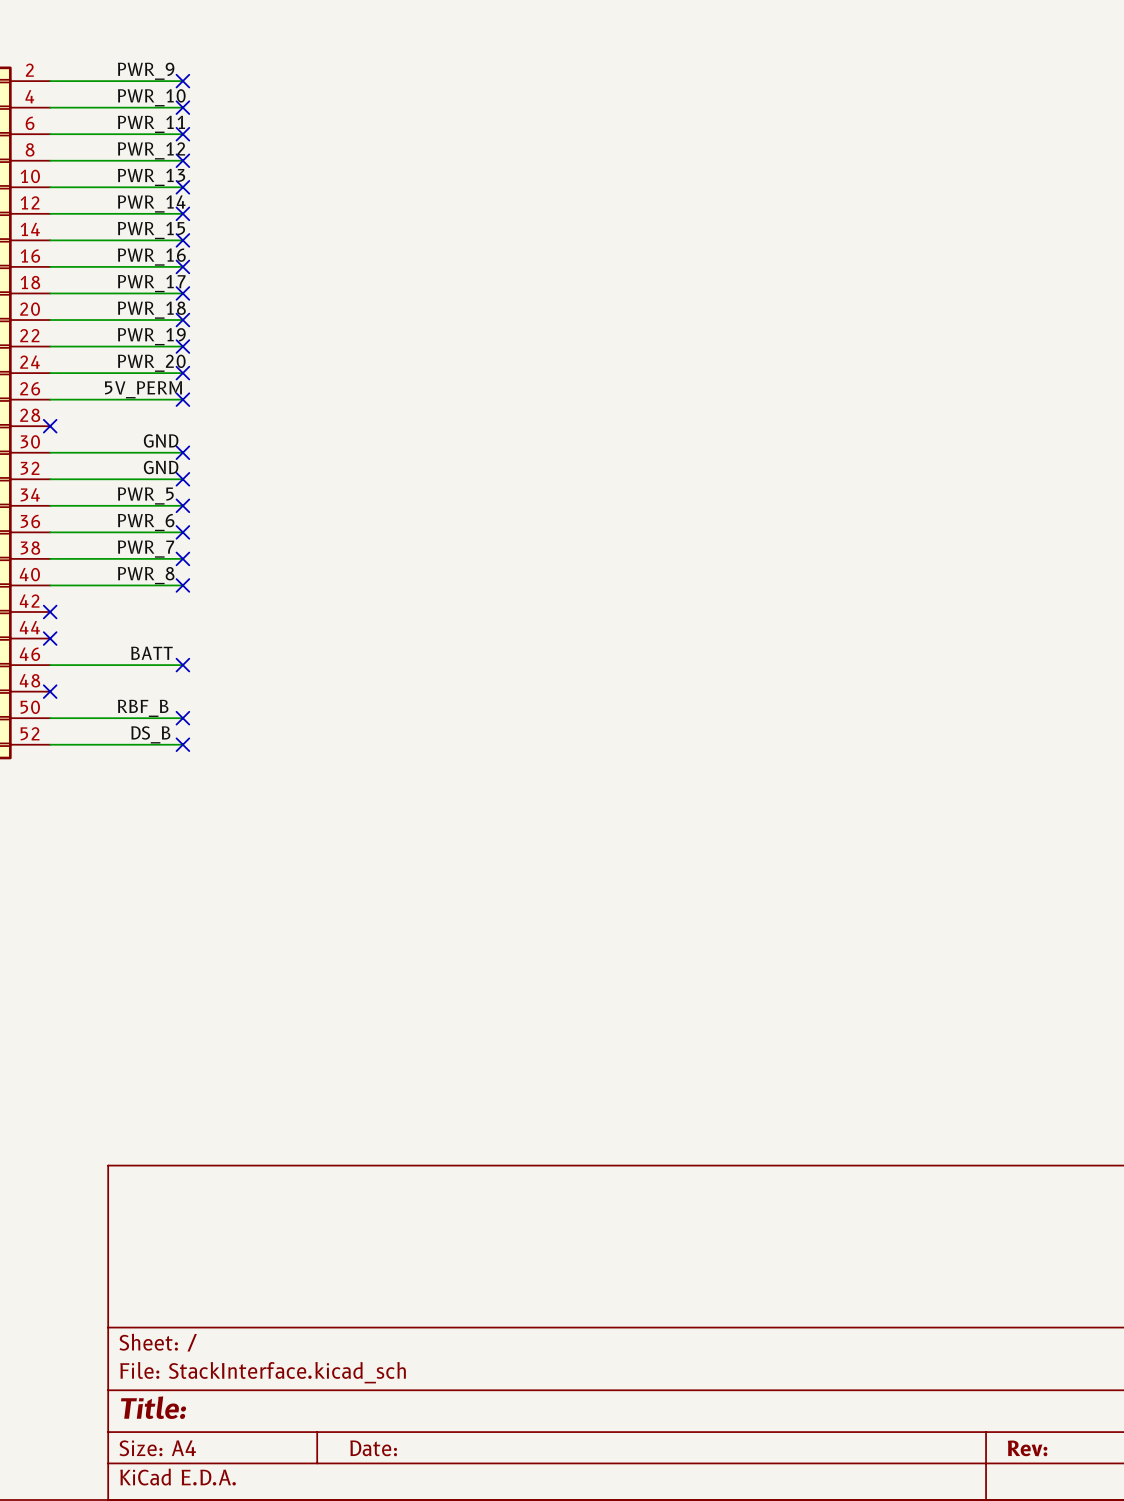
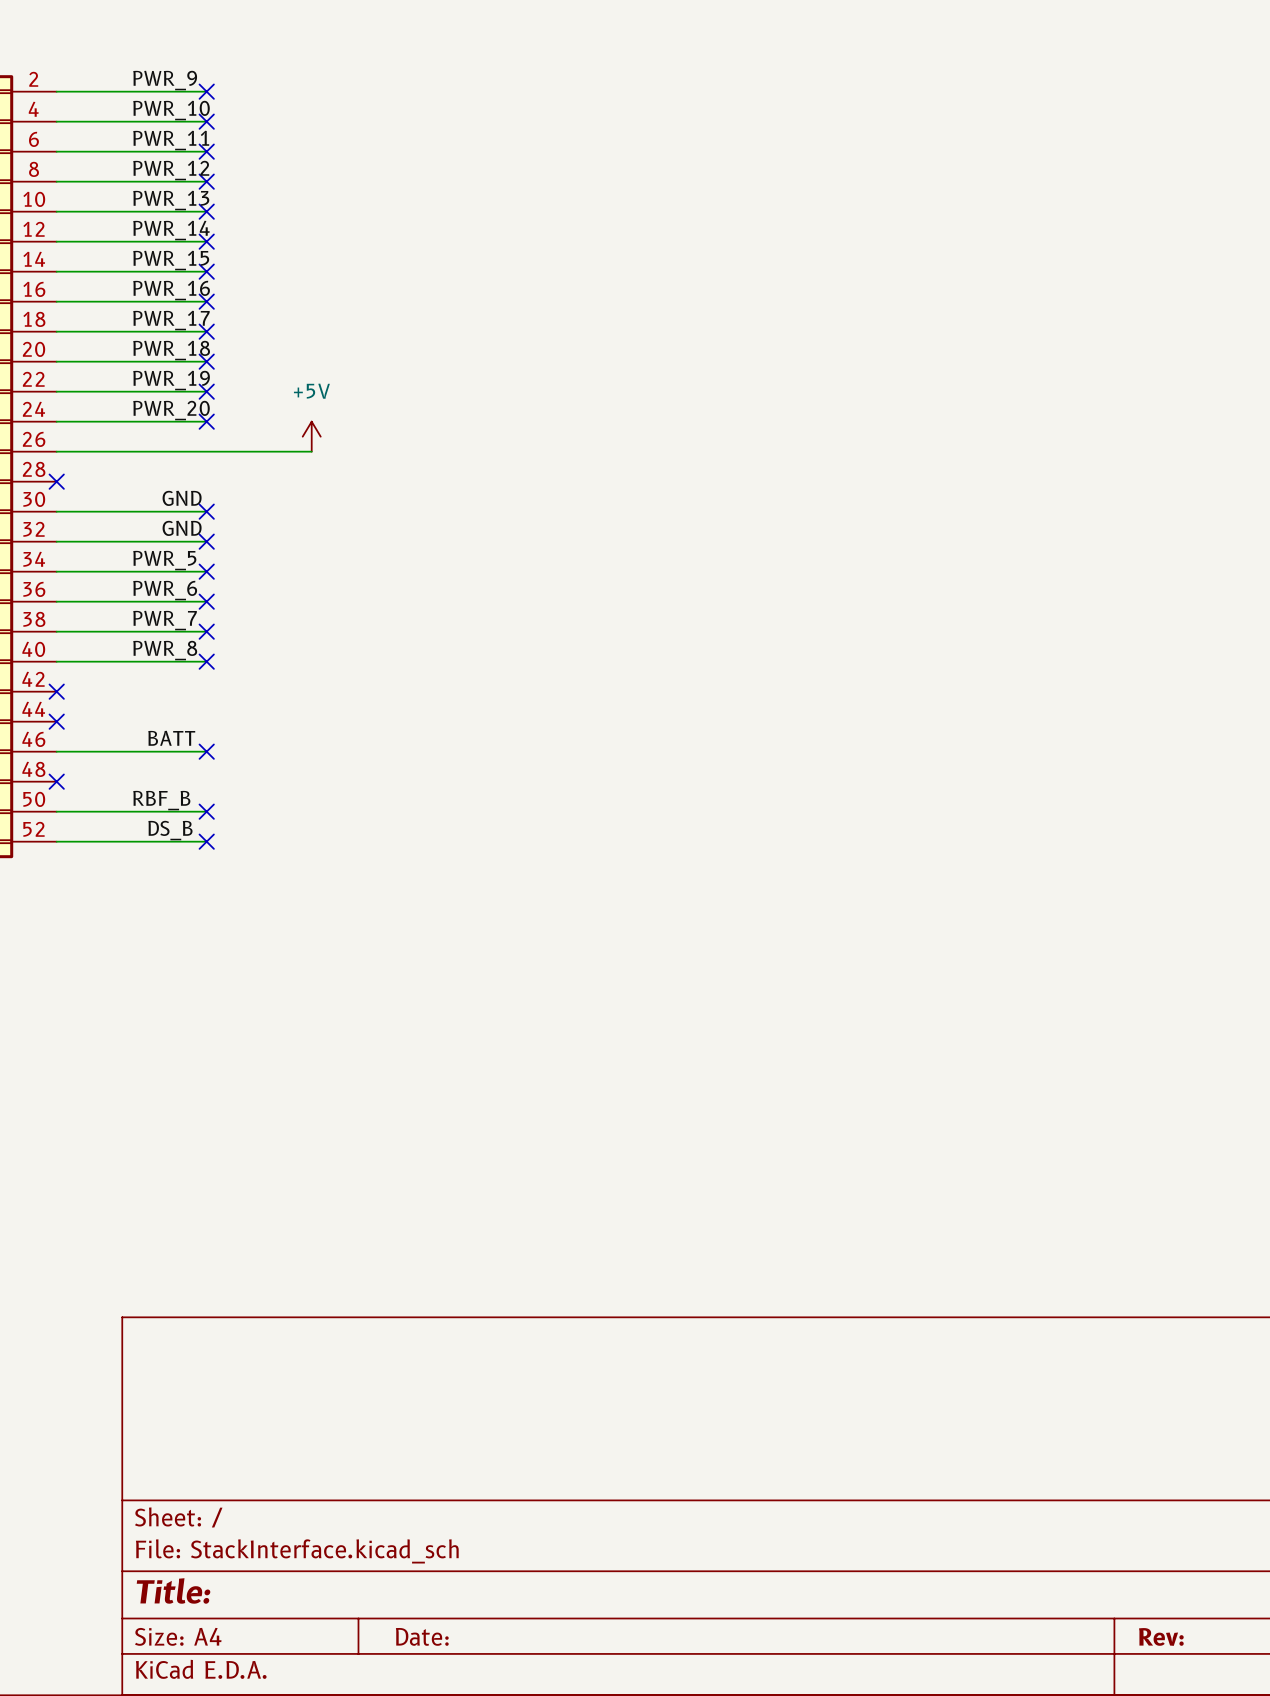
power symbol: none -> +5V (311, 436)
label: 5V_PERM (143, 389) -> none
wire: none -> (206, 451) (311, 451)
no-connect mark: (182, 399) -> none

